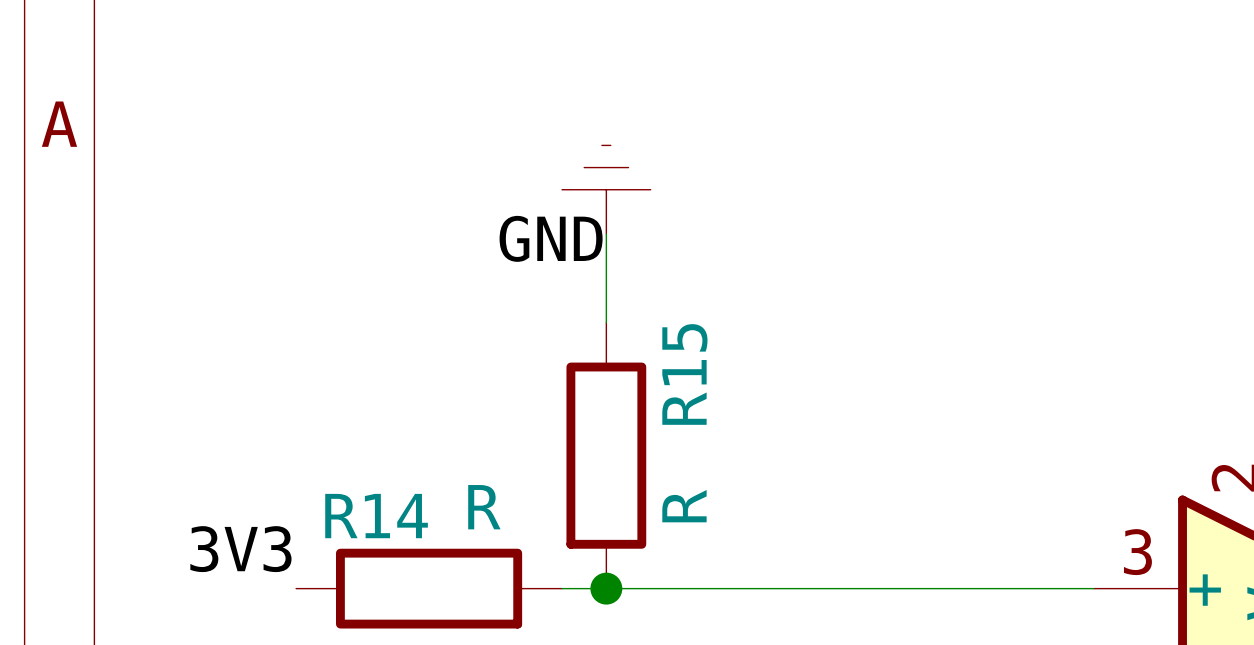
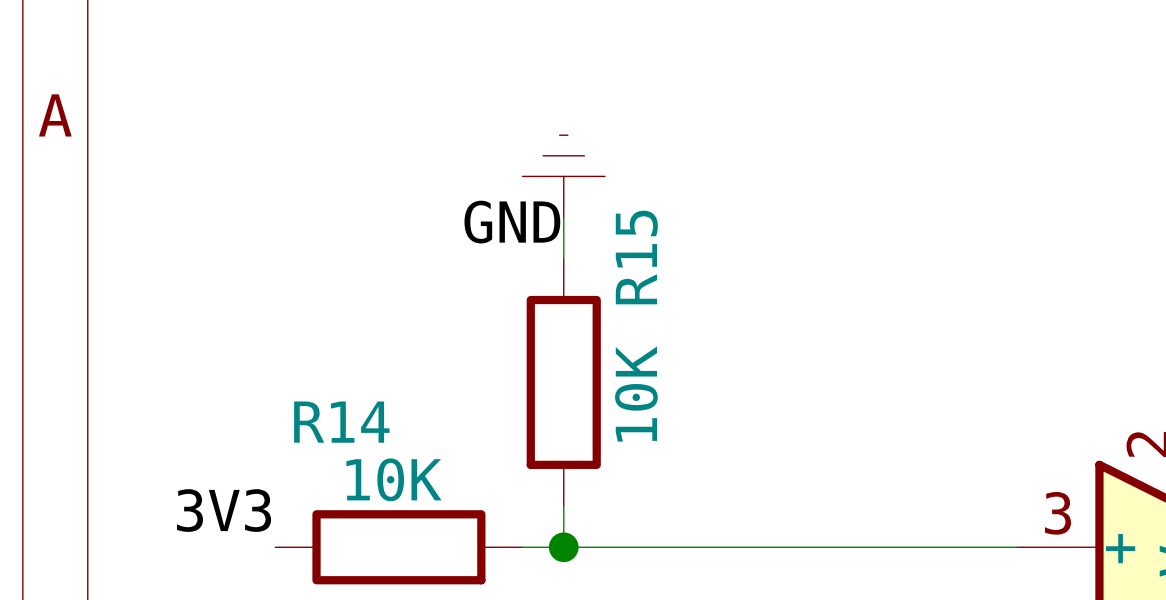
R15 name position: R15 (684, 374) -> R15 (636, 257)
R15 position: (606, 455) -> (563, 382)
R15 value: R (684, 506) -> 10K (636, 394)
R14 value: R (484, 507) -> 10K (393, 479)
R14 name position: R14 (376, 516) -> R14 (341, 422)

